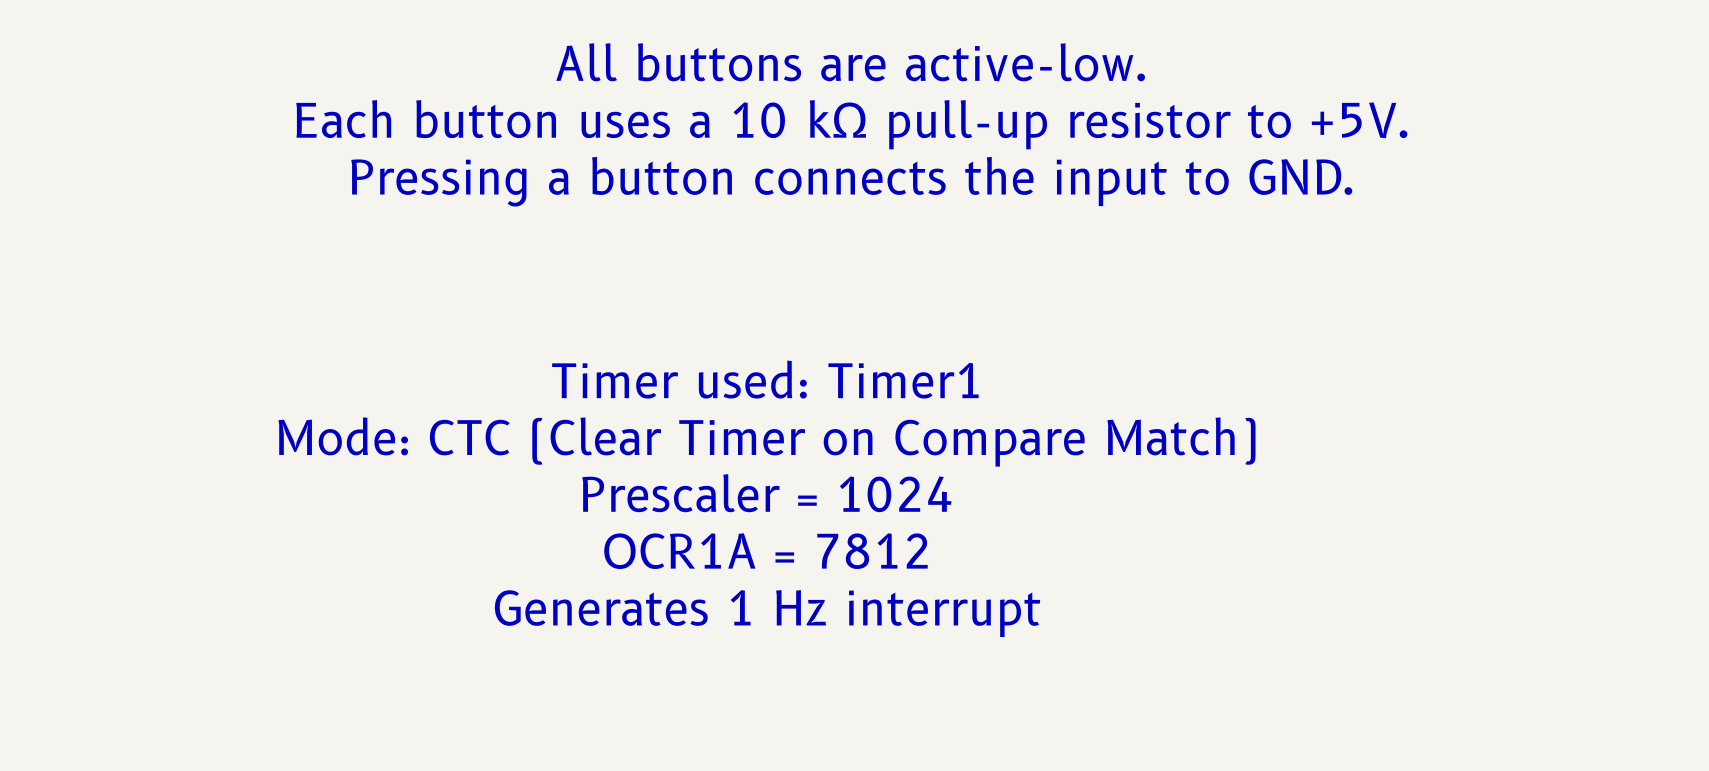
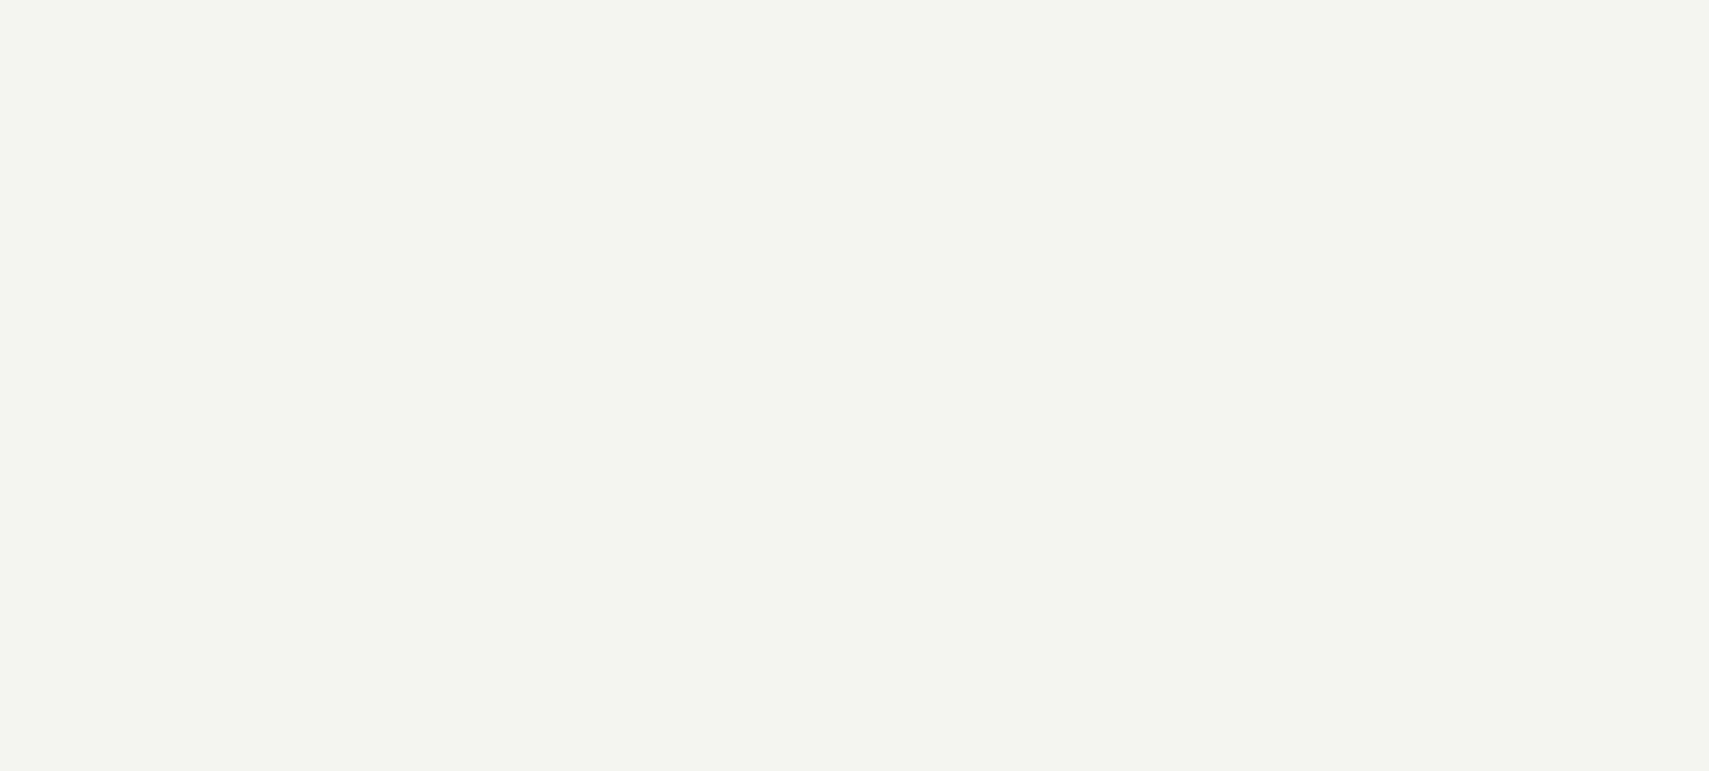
text: All buttons are active-low. (850, 62) -> none
text: Each button uses a 10 kΩ pull-up resistor to +5V. (851, 124) -> none
text: Pressing a button connects the input to GND. (851, 181) -> none
text: Timer used: Timer1 (765, 379) -> none
text: Mode: CTC (Clear Timer on Compare Match) (767, 441) -> none
text: Prescaler = 1024 (766, 493) -> none
text: OCR1A = 7812 (765, 551) -> none
text: Generates 1 Hz interrupt (767, 613) -> none

